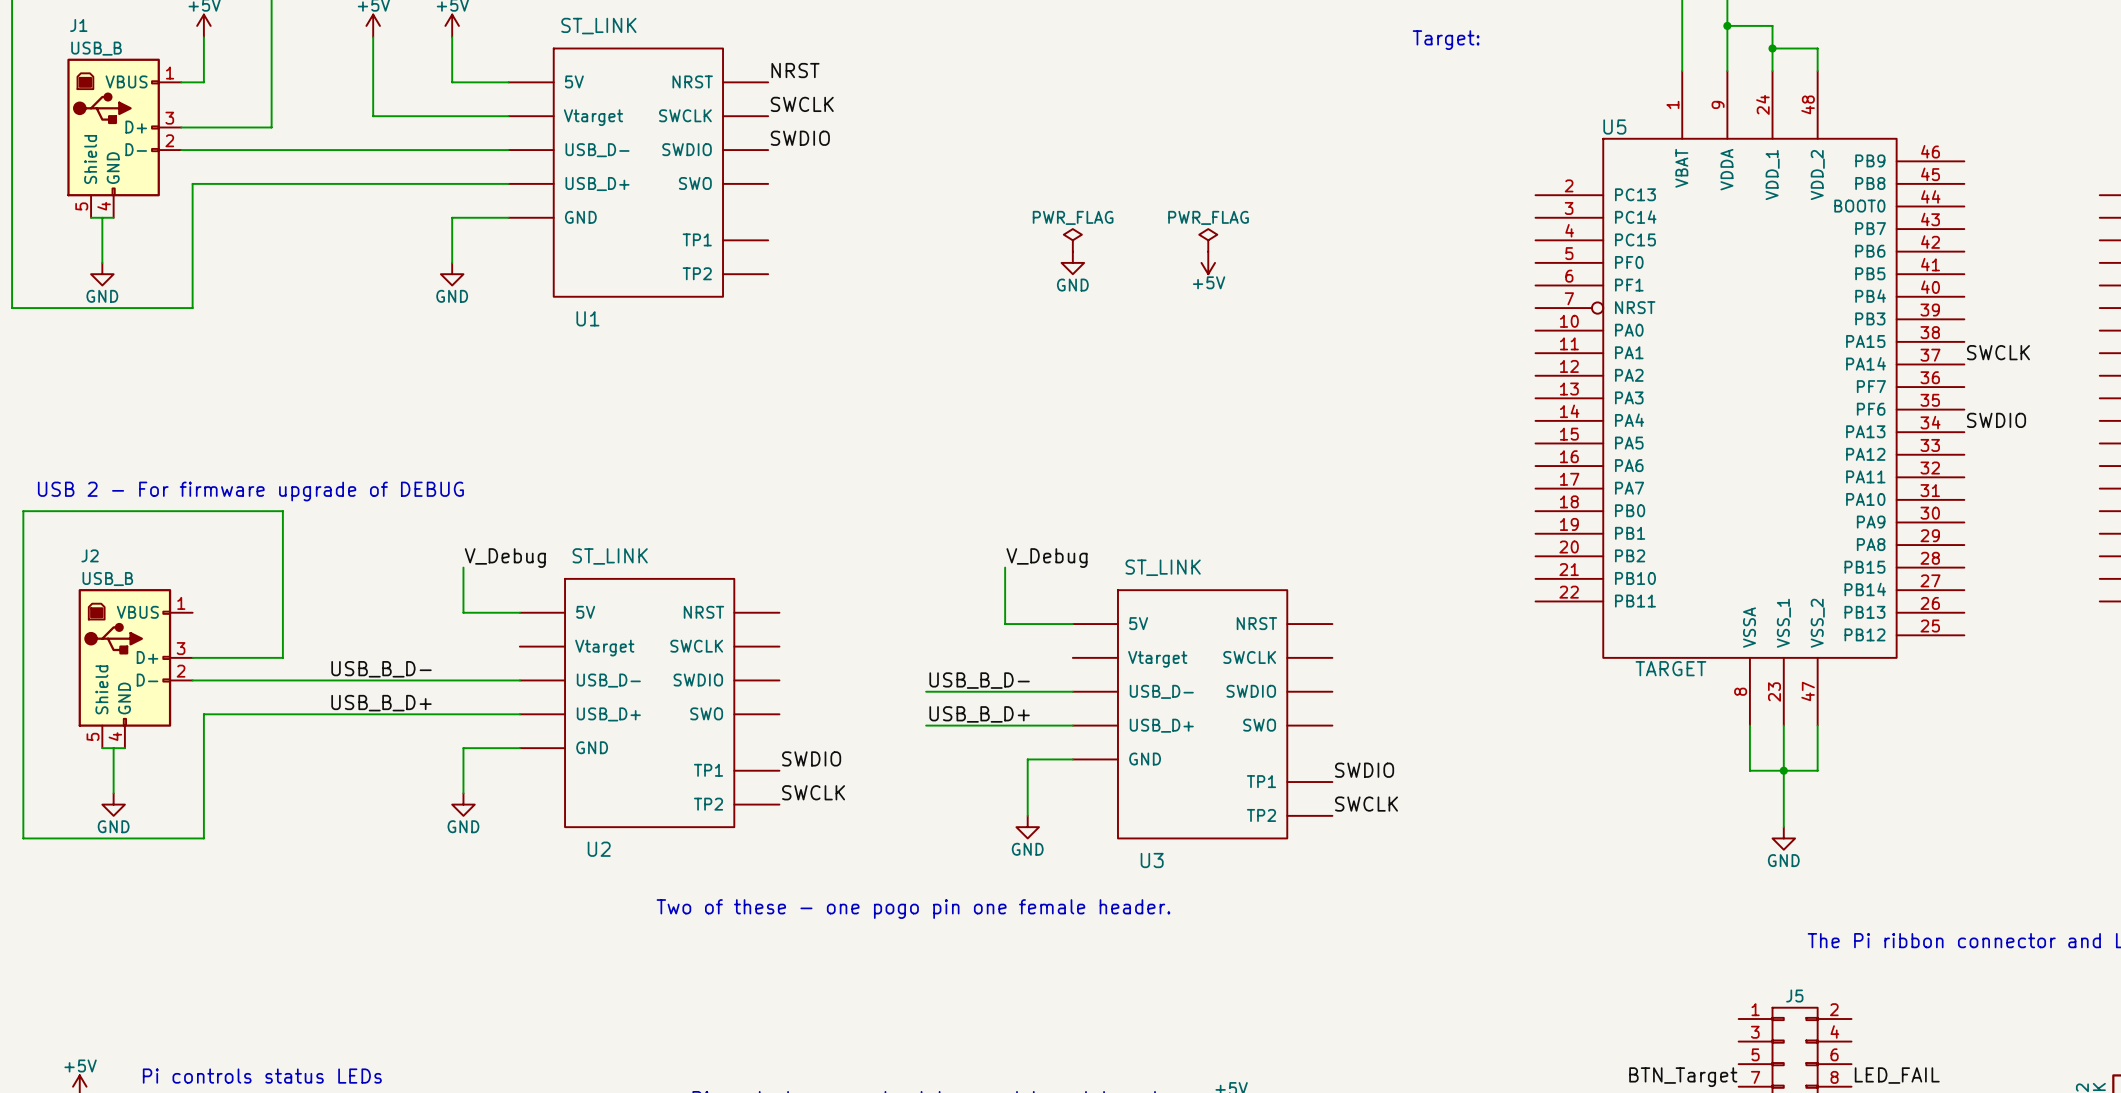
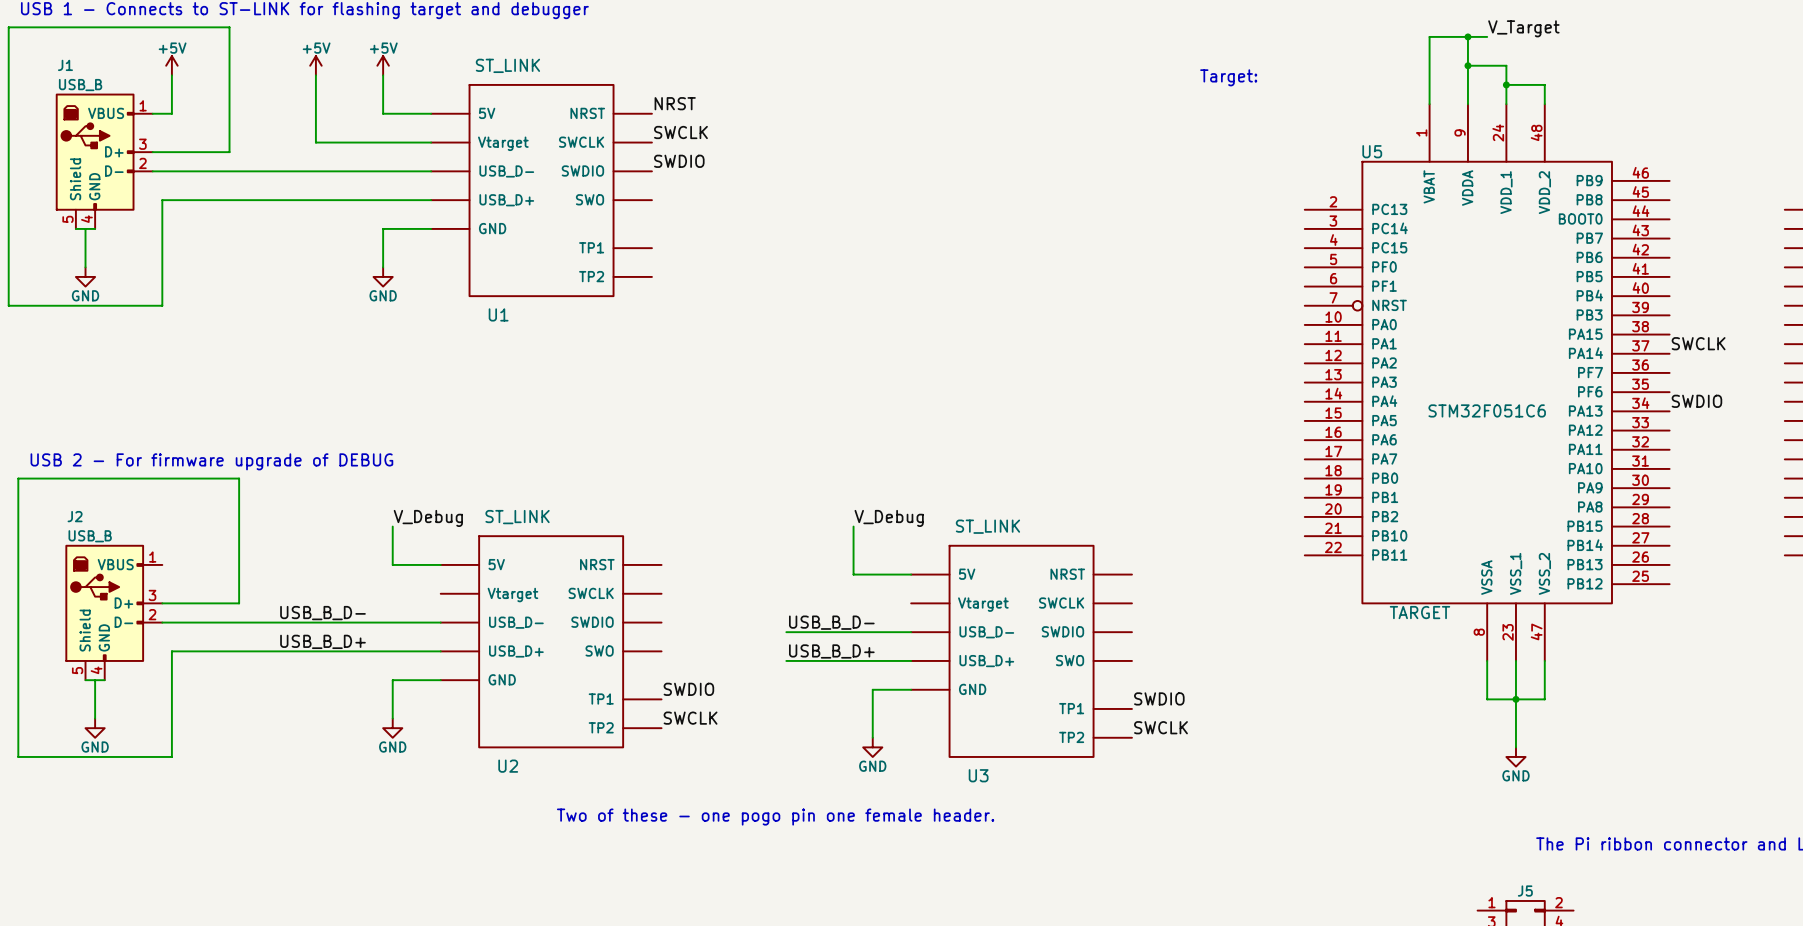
power symbol: PWR_FLAG (1072, 240) -> none
power symbol: PWR_FLAG (1208, 240) -> none
power symbol: GND (1072, 262) -> none
power symbol: +5V (1208, 262) -> none
U5 text: none -> STM32F051C6 (1487, 410)

